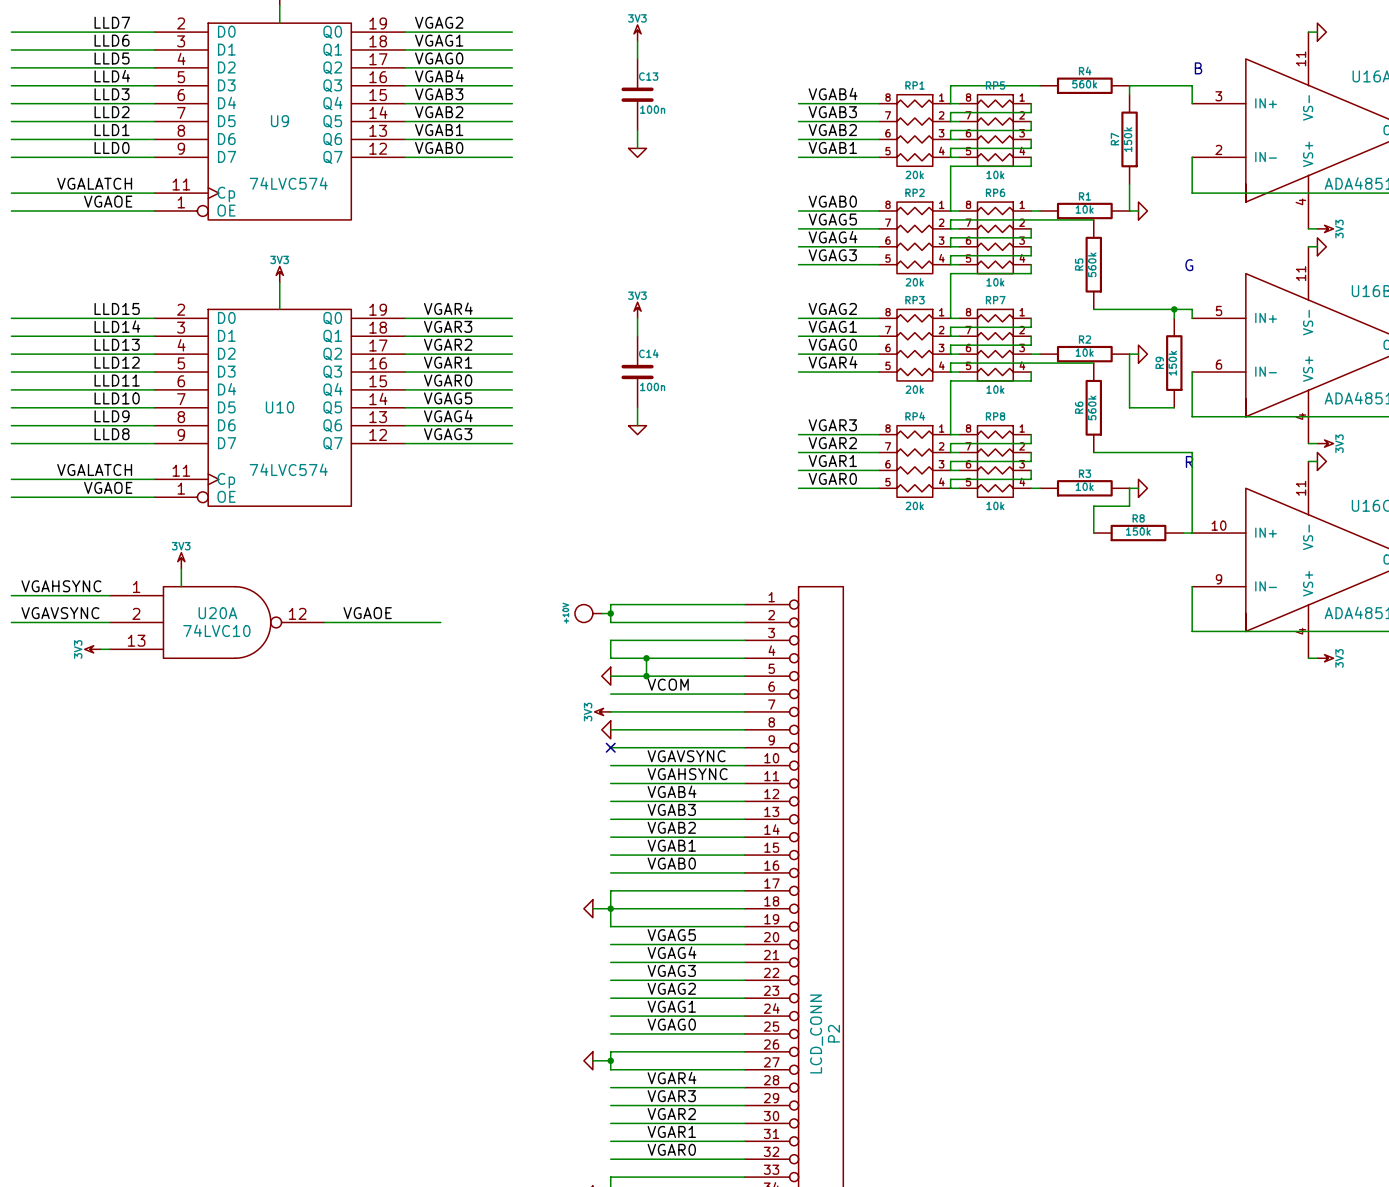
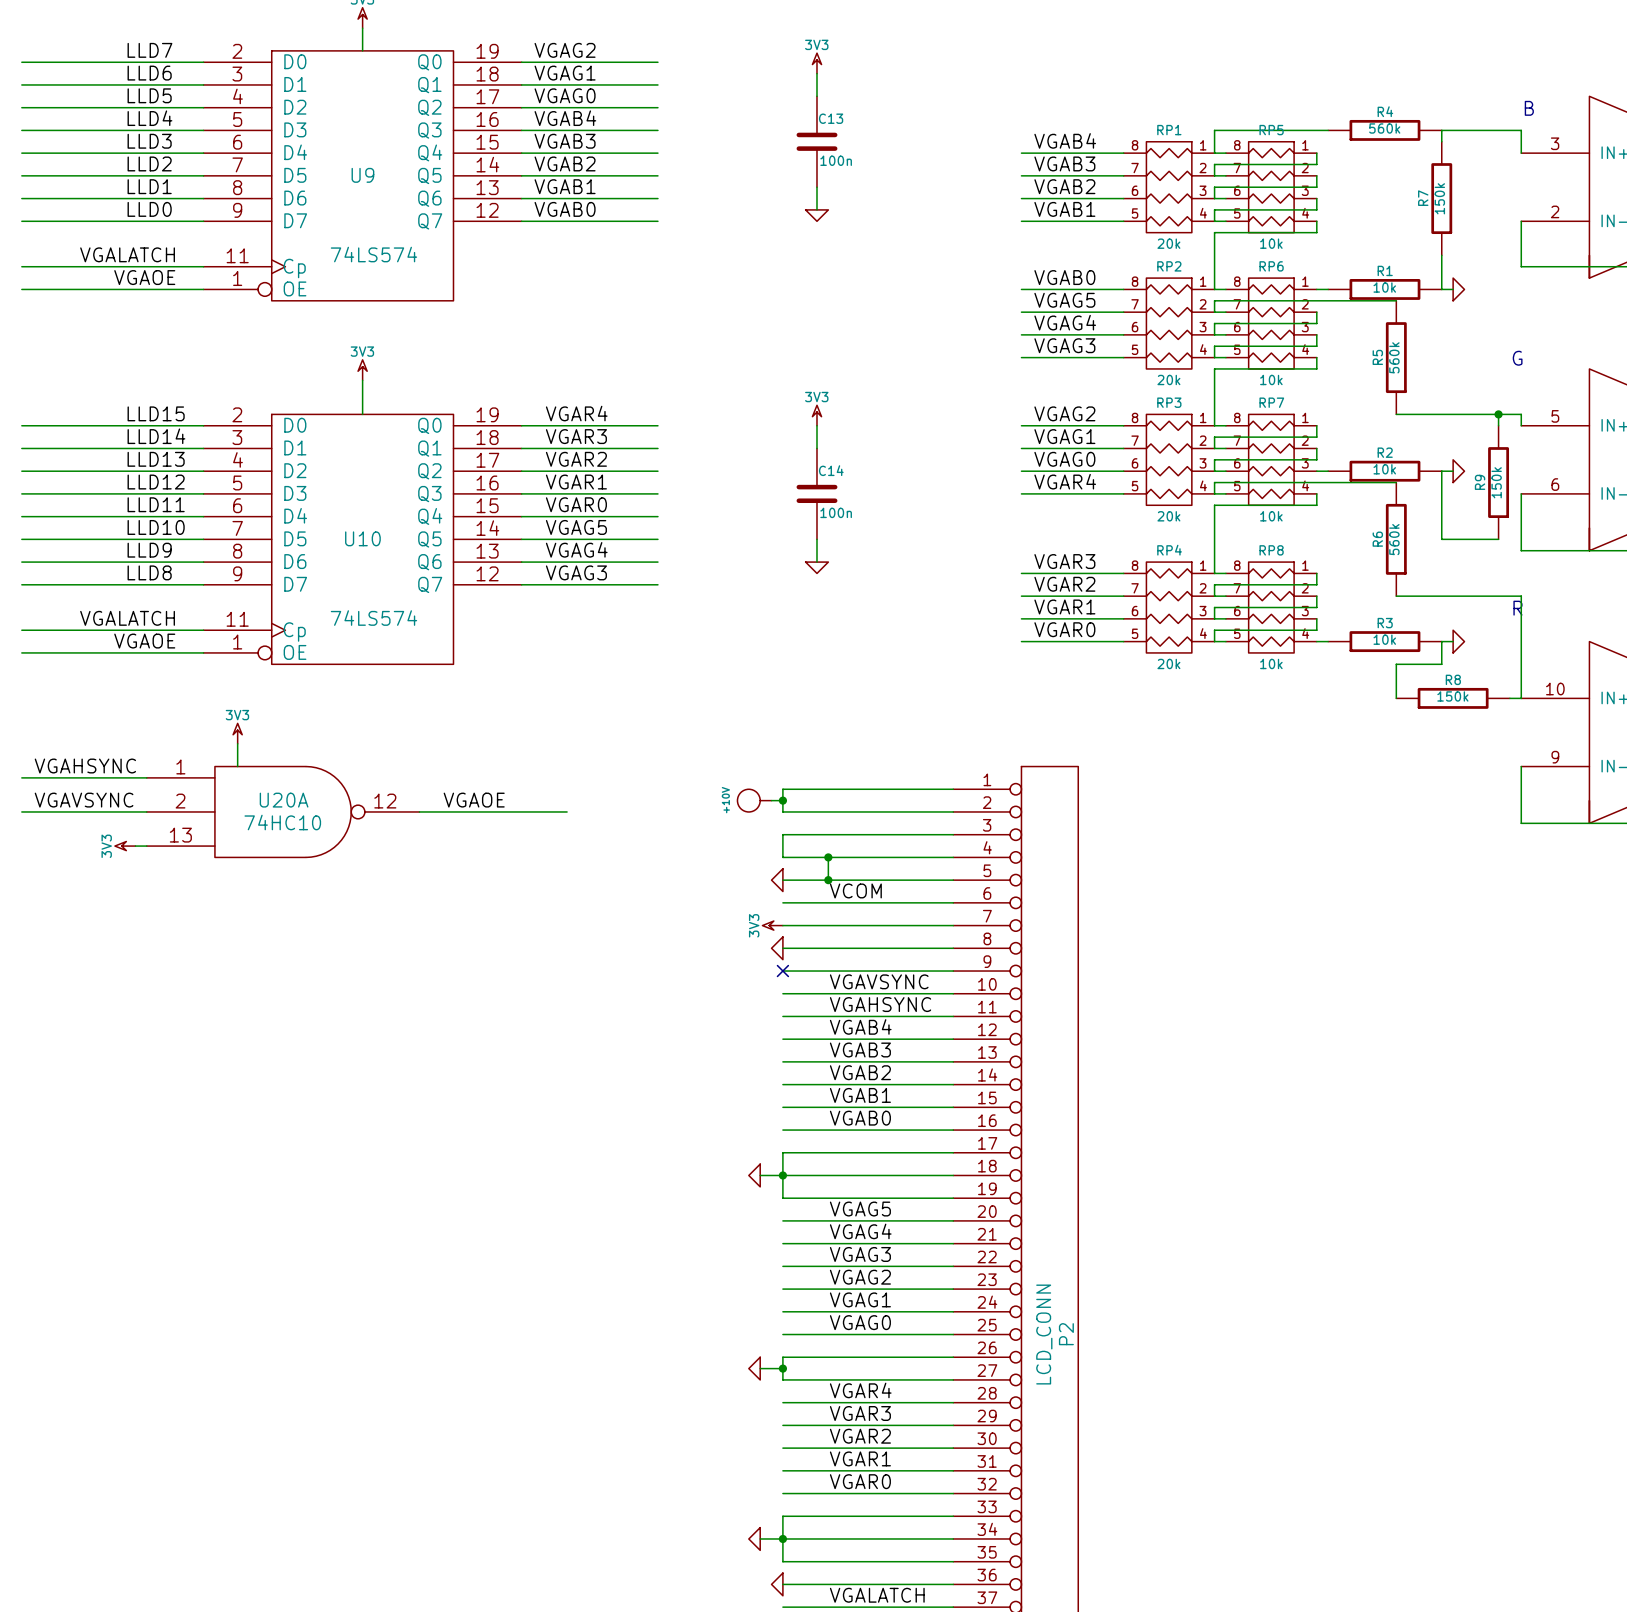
U9 value: 74LVC574 (288, 183) -> 74LS574 (373, 254)
U10 value: 74LVC574 (288, 469) -> 74LS574 (373, 618)
U20A value: 74LVC10 (216, 630) -> 74HC10 (282, 822)

